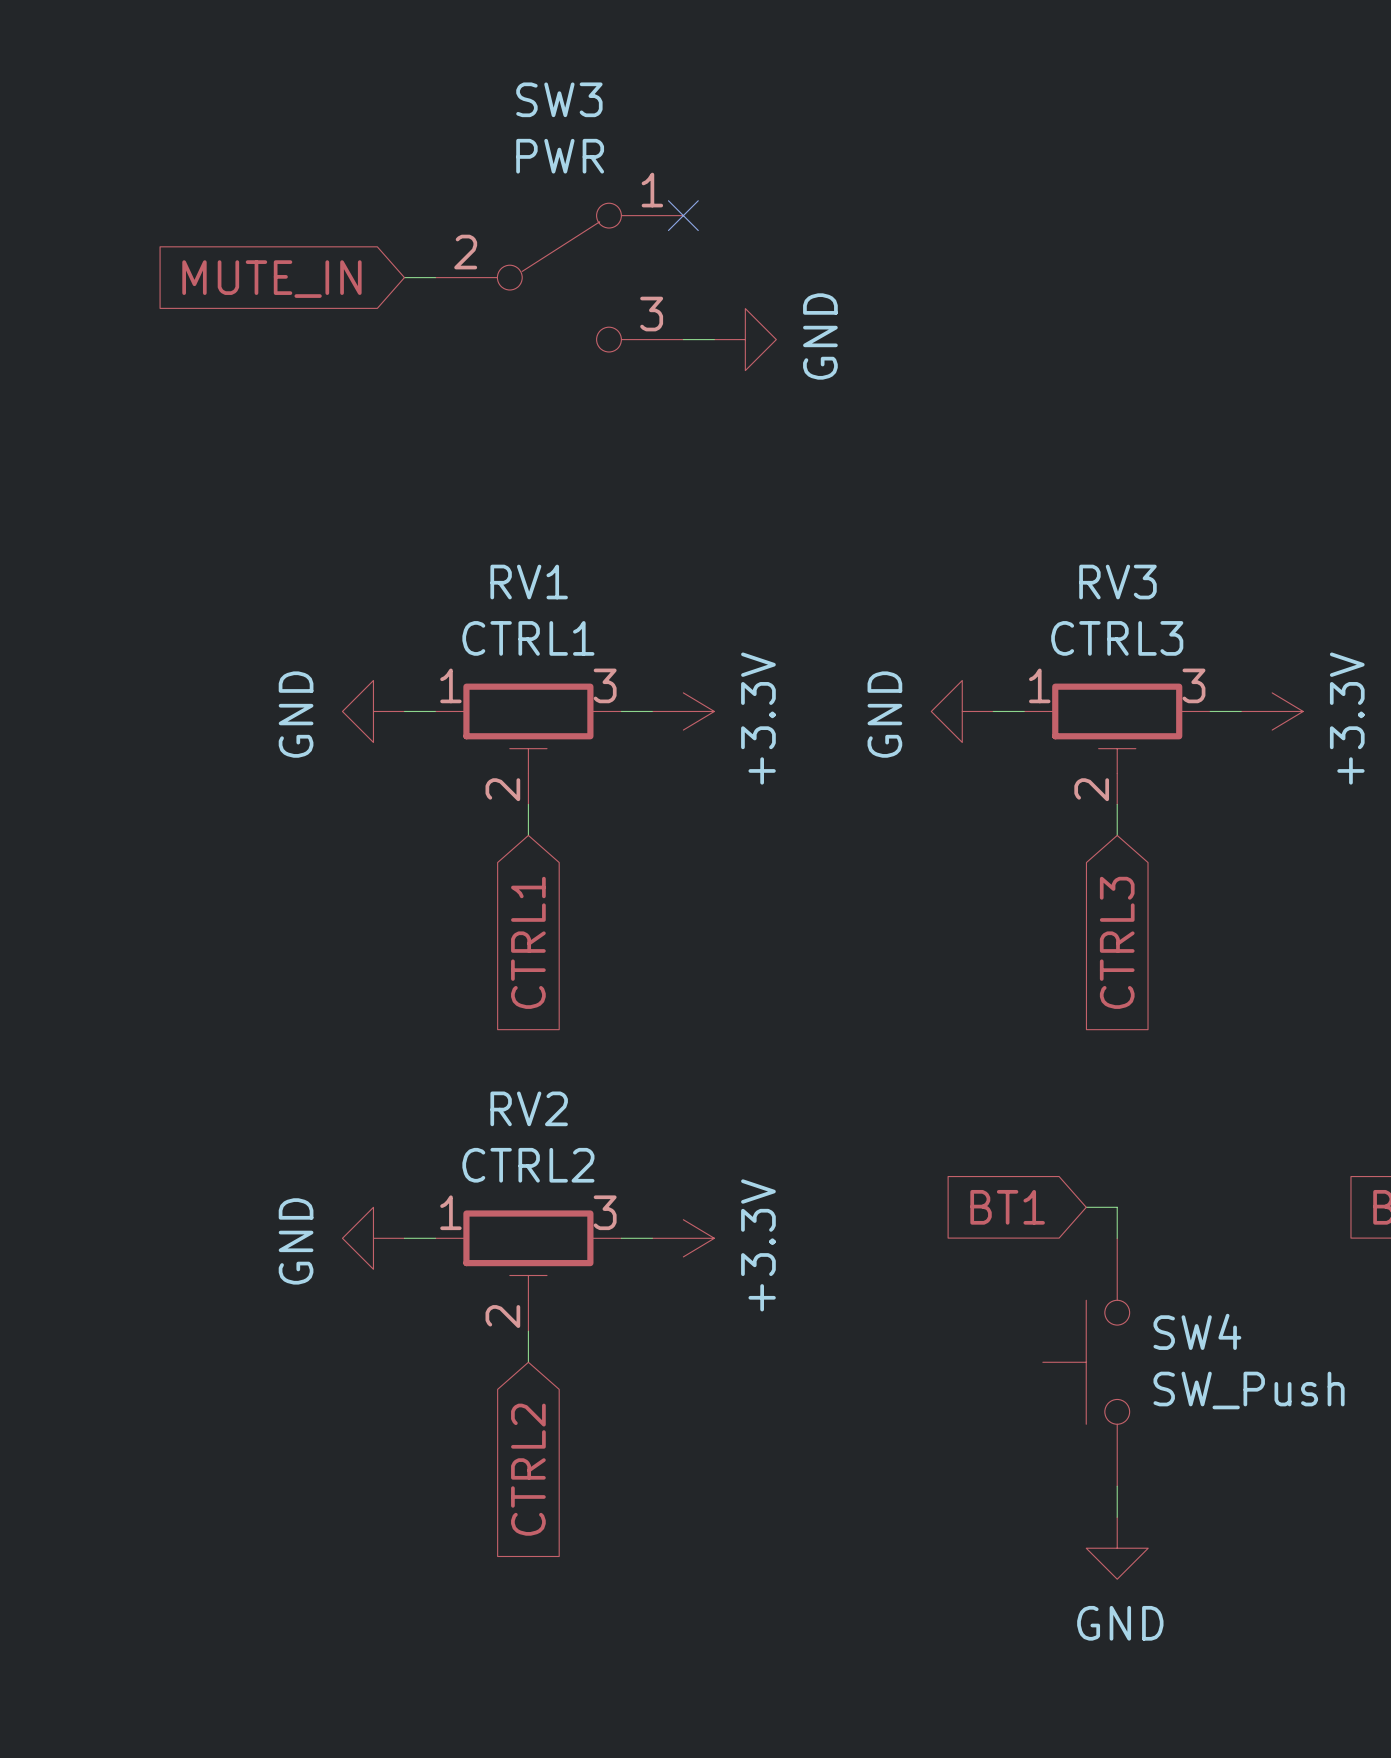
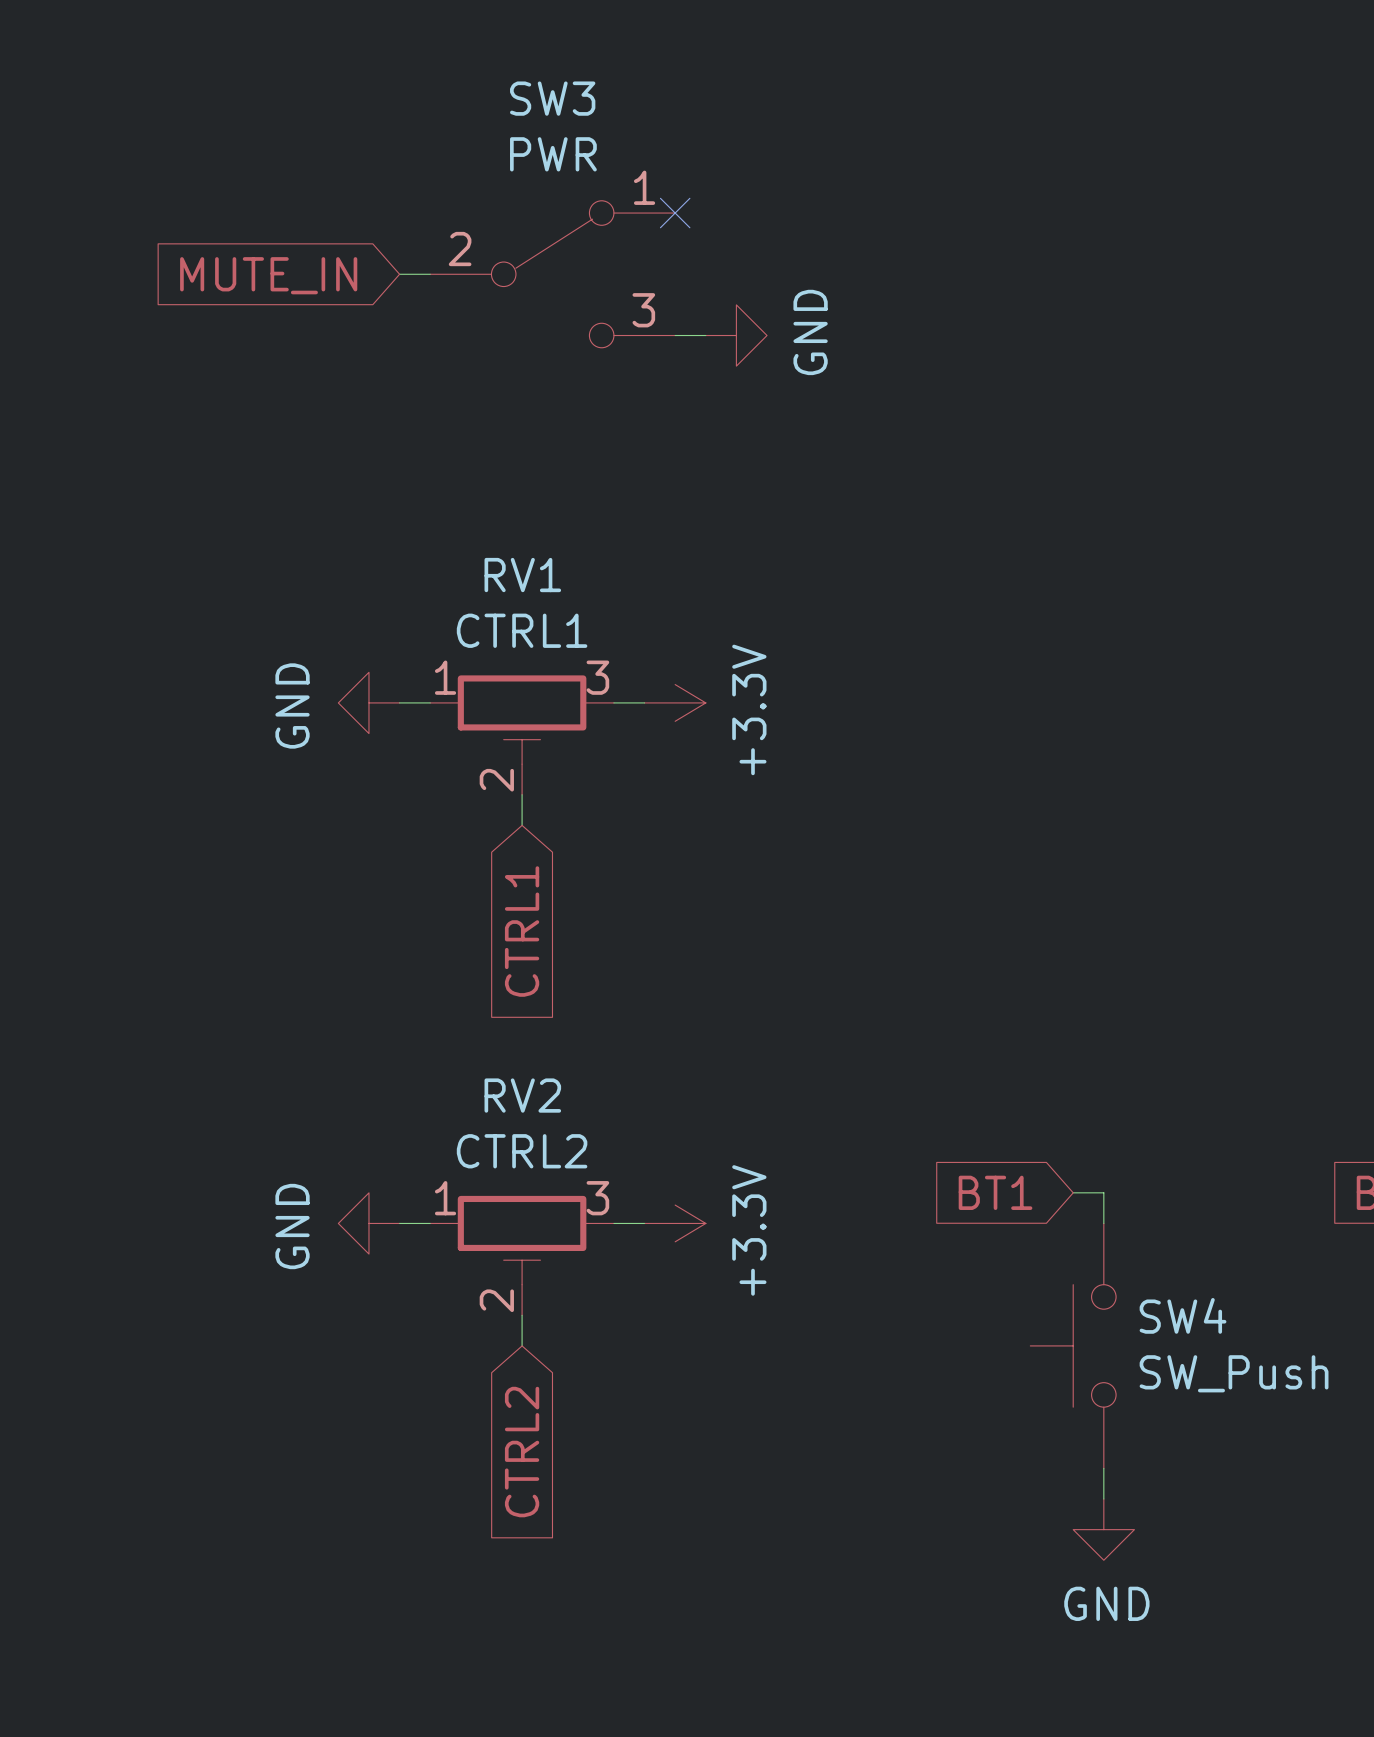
power symbol: GND (962, 711) -> none
wire: (993, 711) (1024, 711) -> none
wire: (1210, 711) (1241, 711) -> none
power symbol: +3.3V (1272, 711) -> none
RV3: CTRL3 (1117, 744) -> none
wire: (1117, 804) (1117, 835) -> none
global label: CTRL3 (1117, 942) -> none

